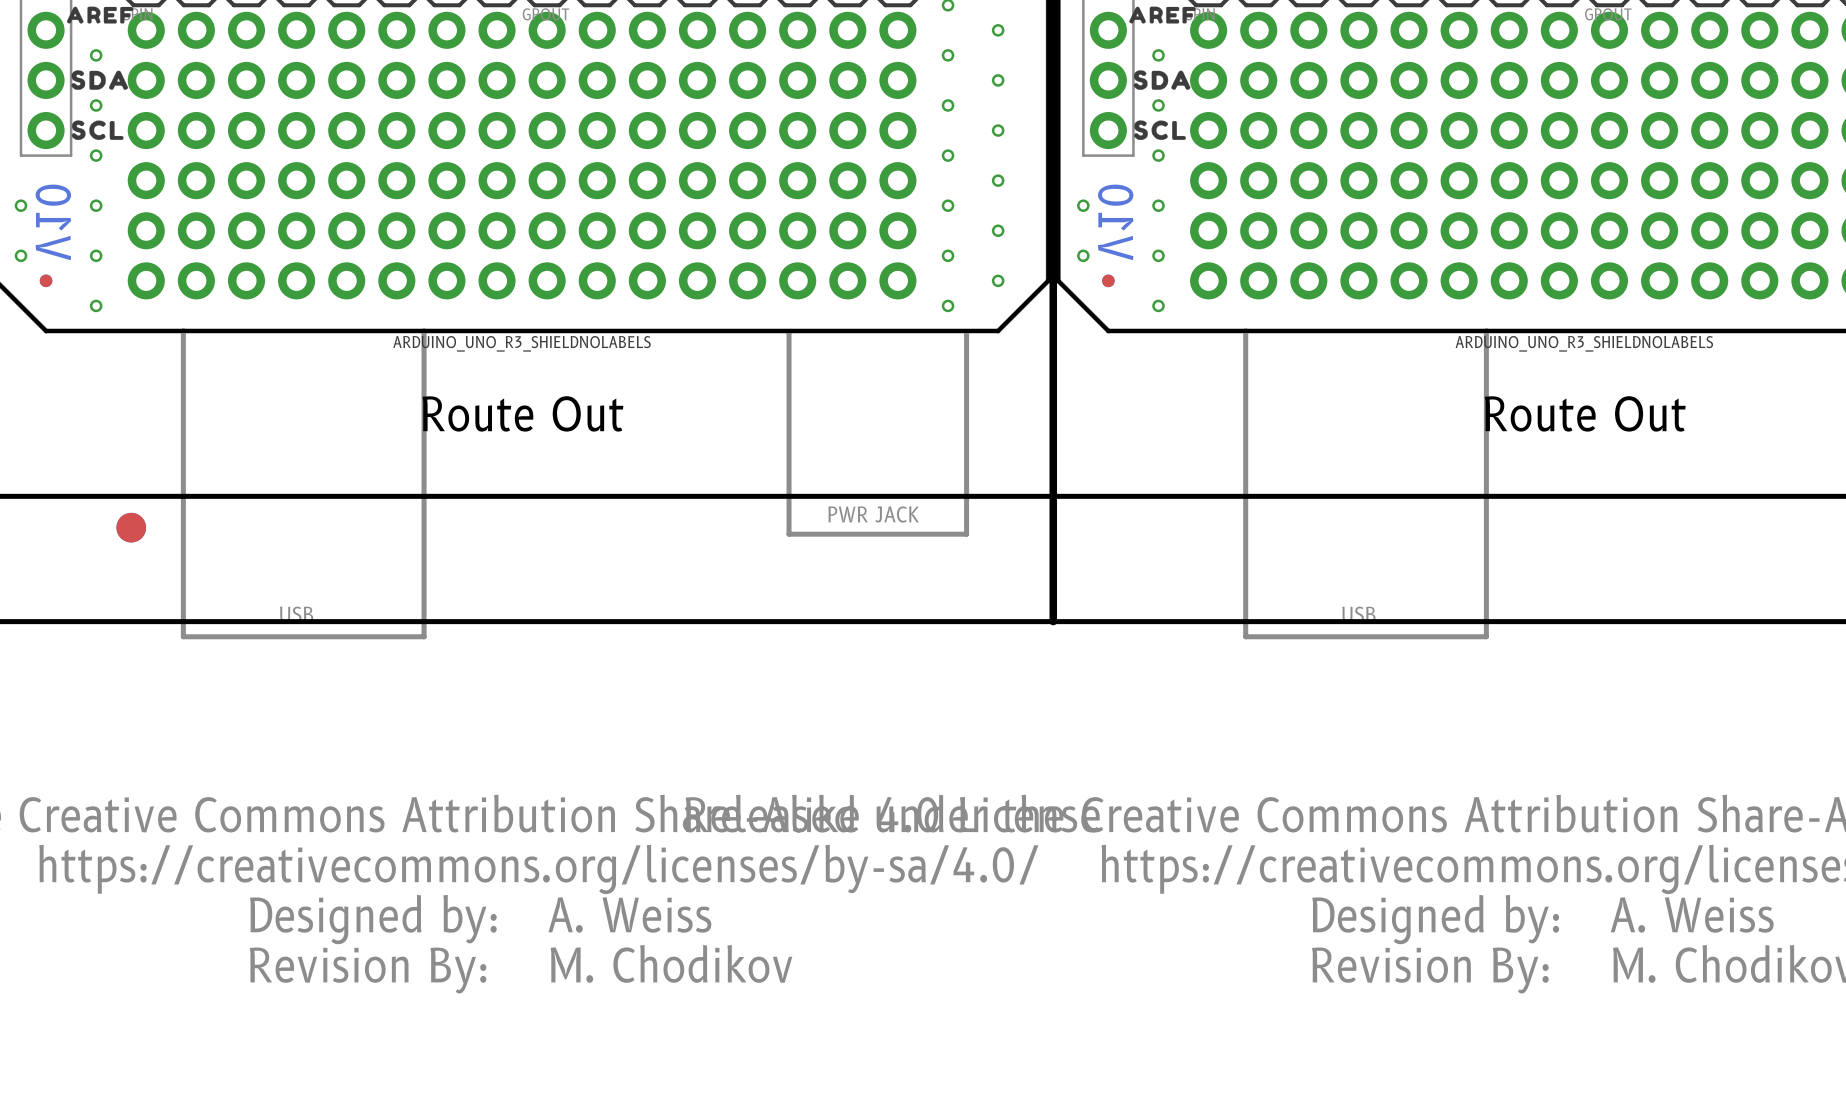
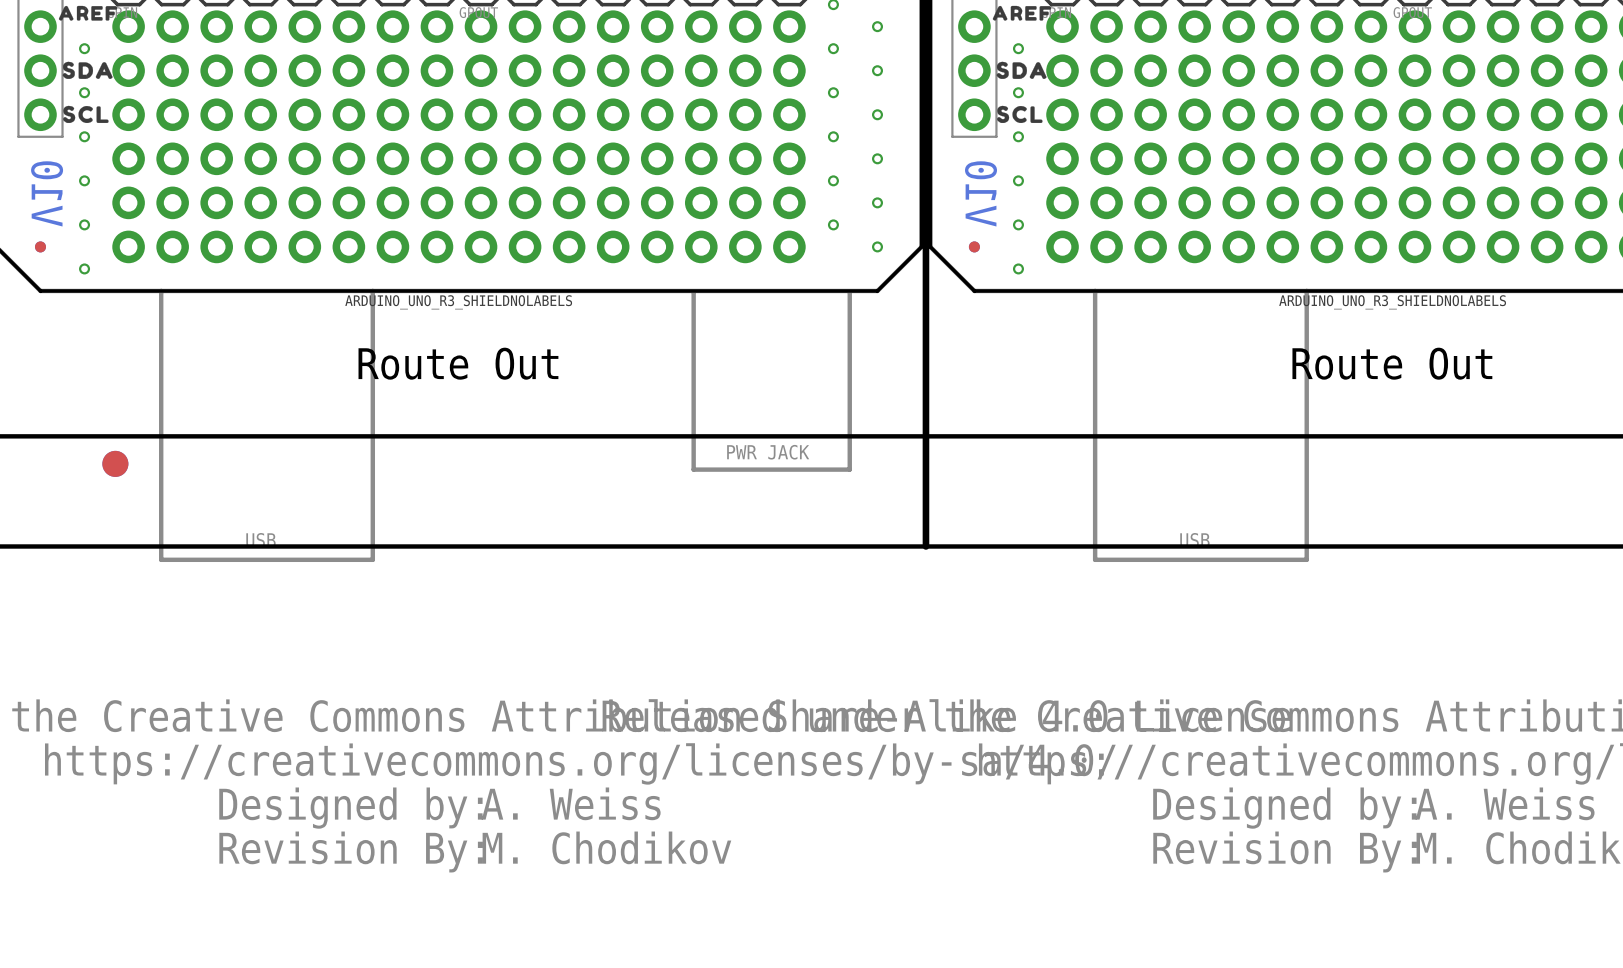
via: (21, 205) -> none
via: (1083, 205) -> none
via: (21, 255) -> none
via: (1083, 255) -> none
via: (948, 305) -> none

